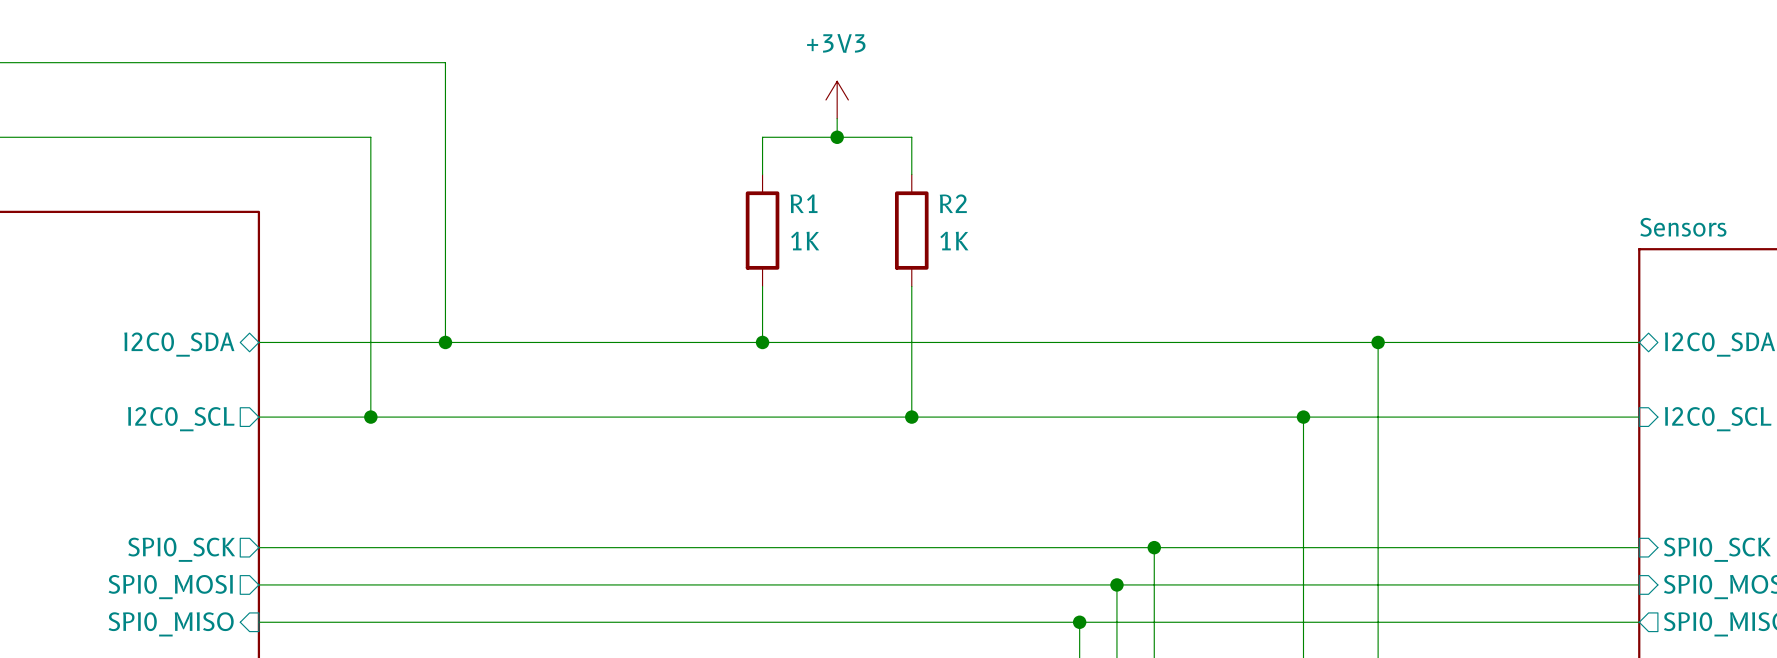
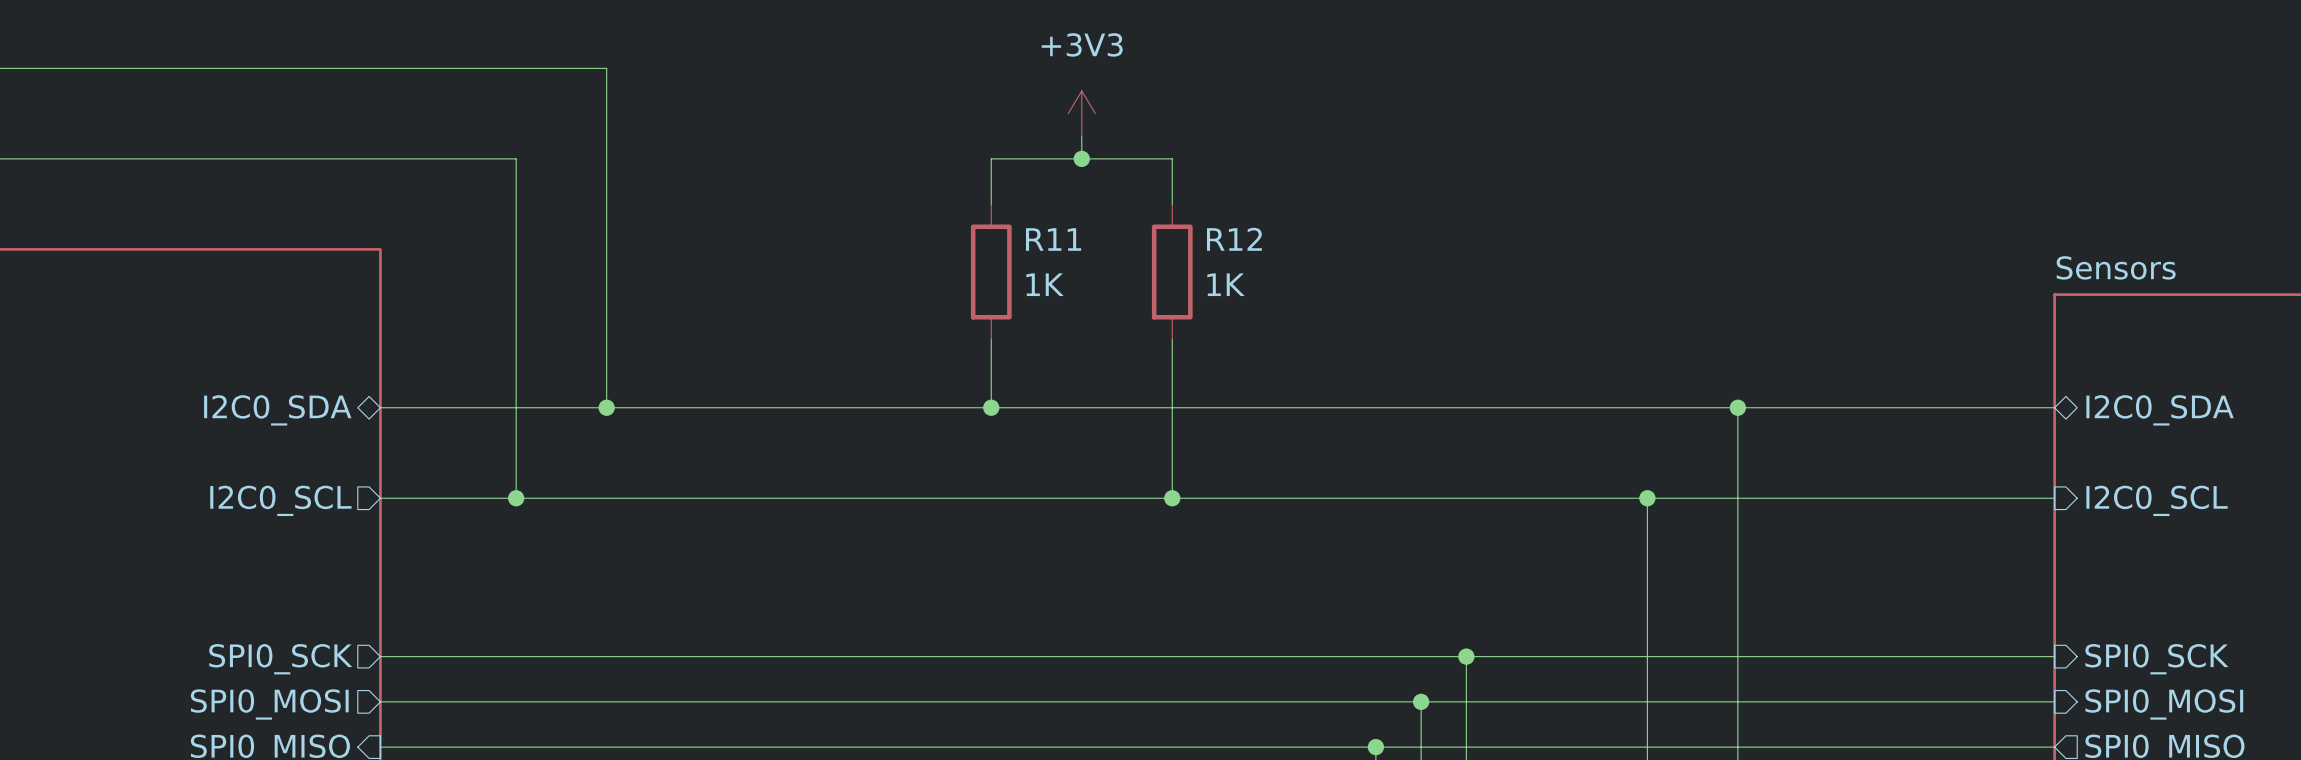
R1 name: R1 (804, 203) -> R11 (1053, 239)
R2 name: R2 (953, 203) -> R12 (1234, 239)

